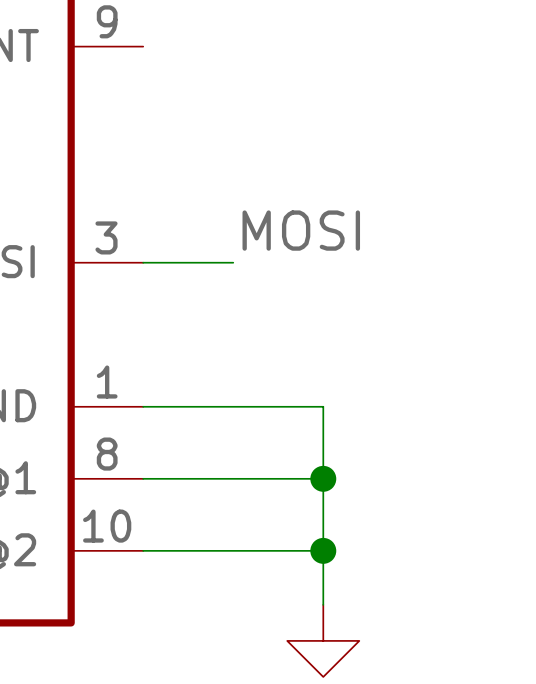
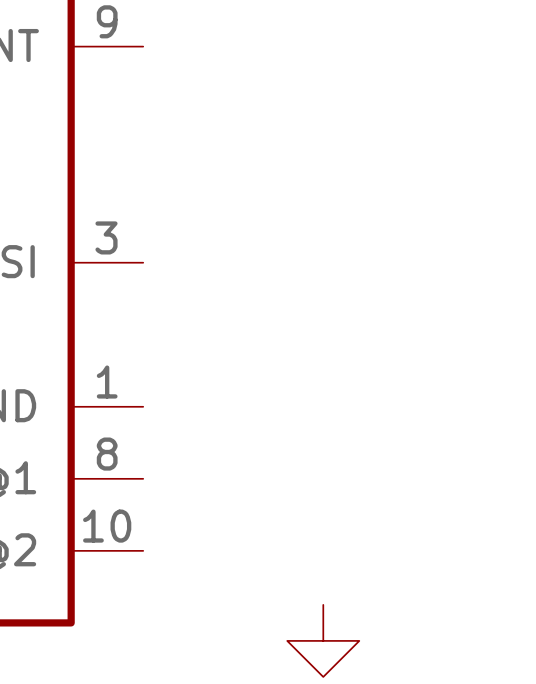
label: MOSI (301, 230) -> none
wire: (143, 262) (233, 262) -> none
wire: (143, 406) (323, 406) (323, 604) -> none
wire: (143, 478) (323, 478) -> none
junction: (323, 478) -> none
wire: (143, 550) (323, 550) -> none
junction: (323, 550) -> none

